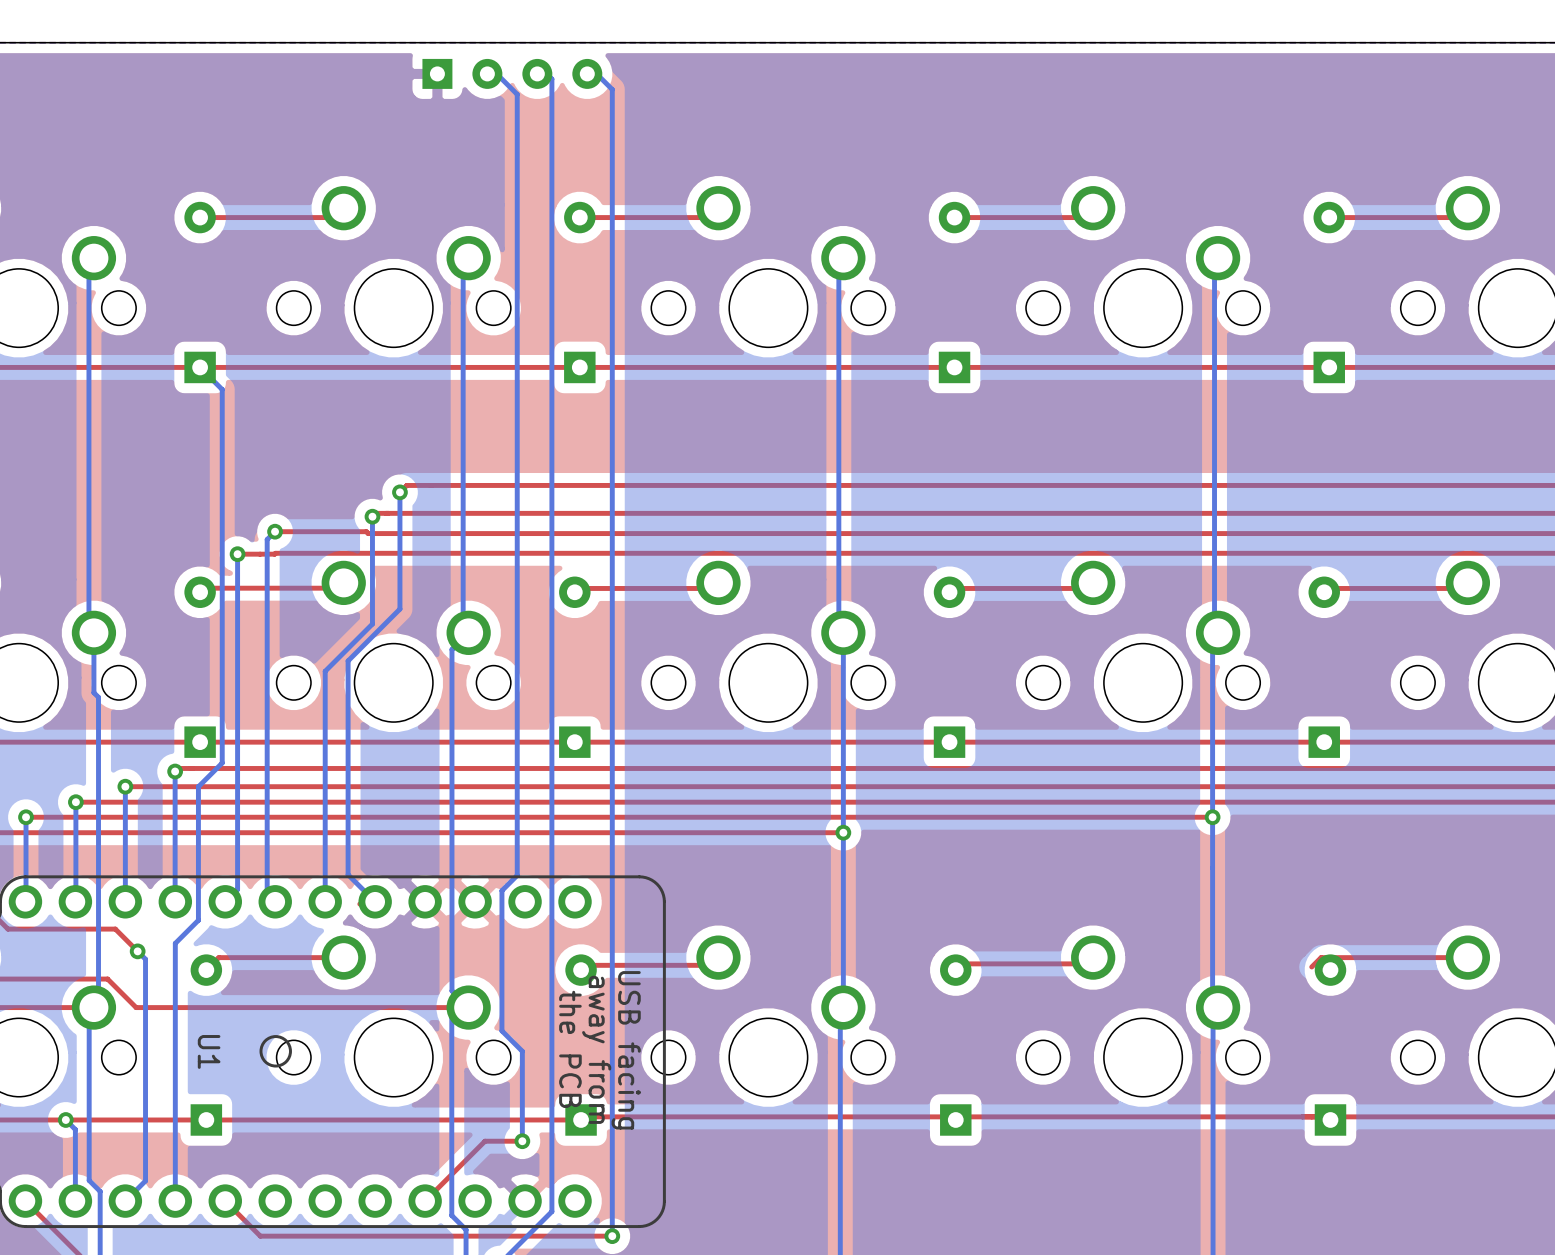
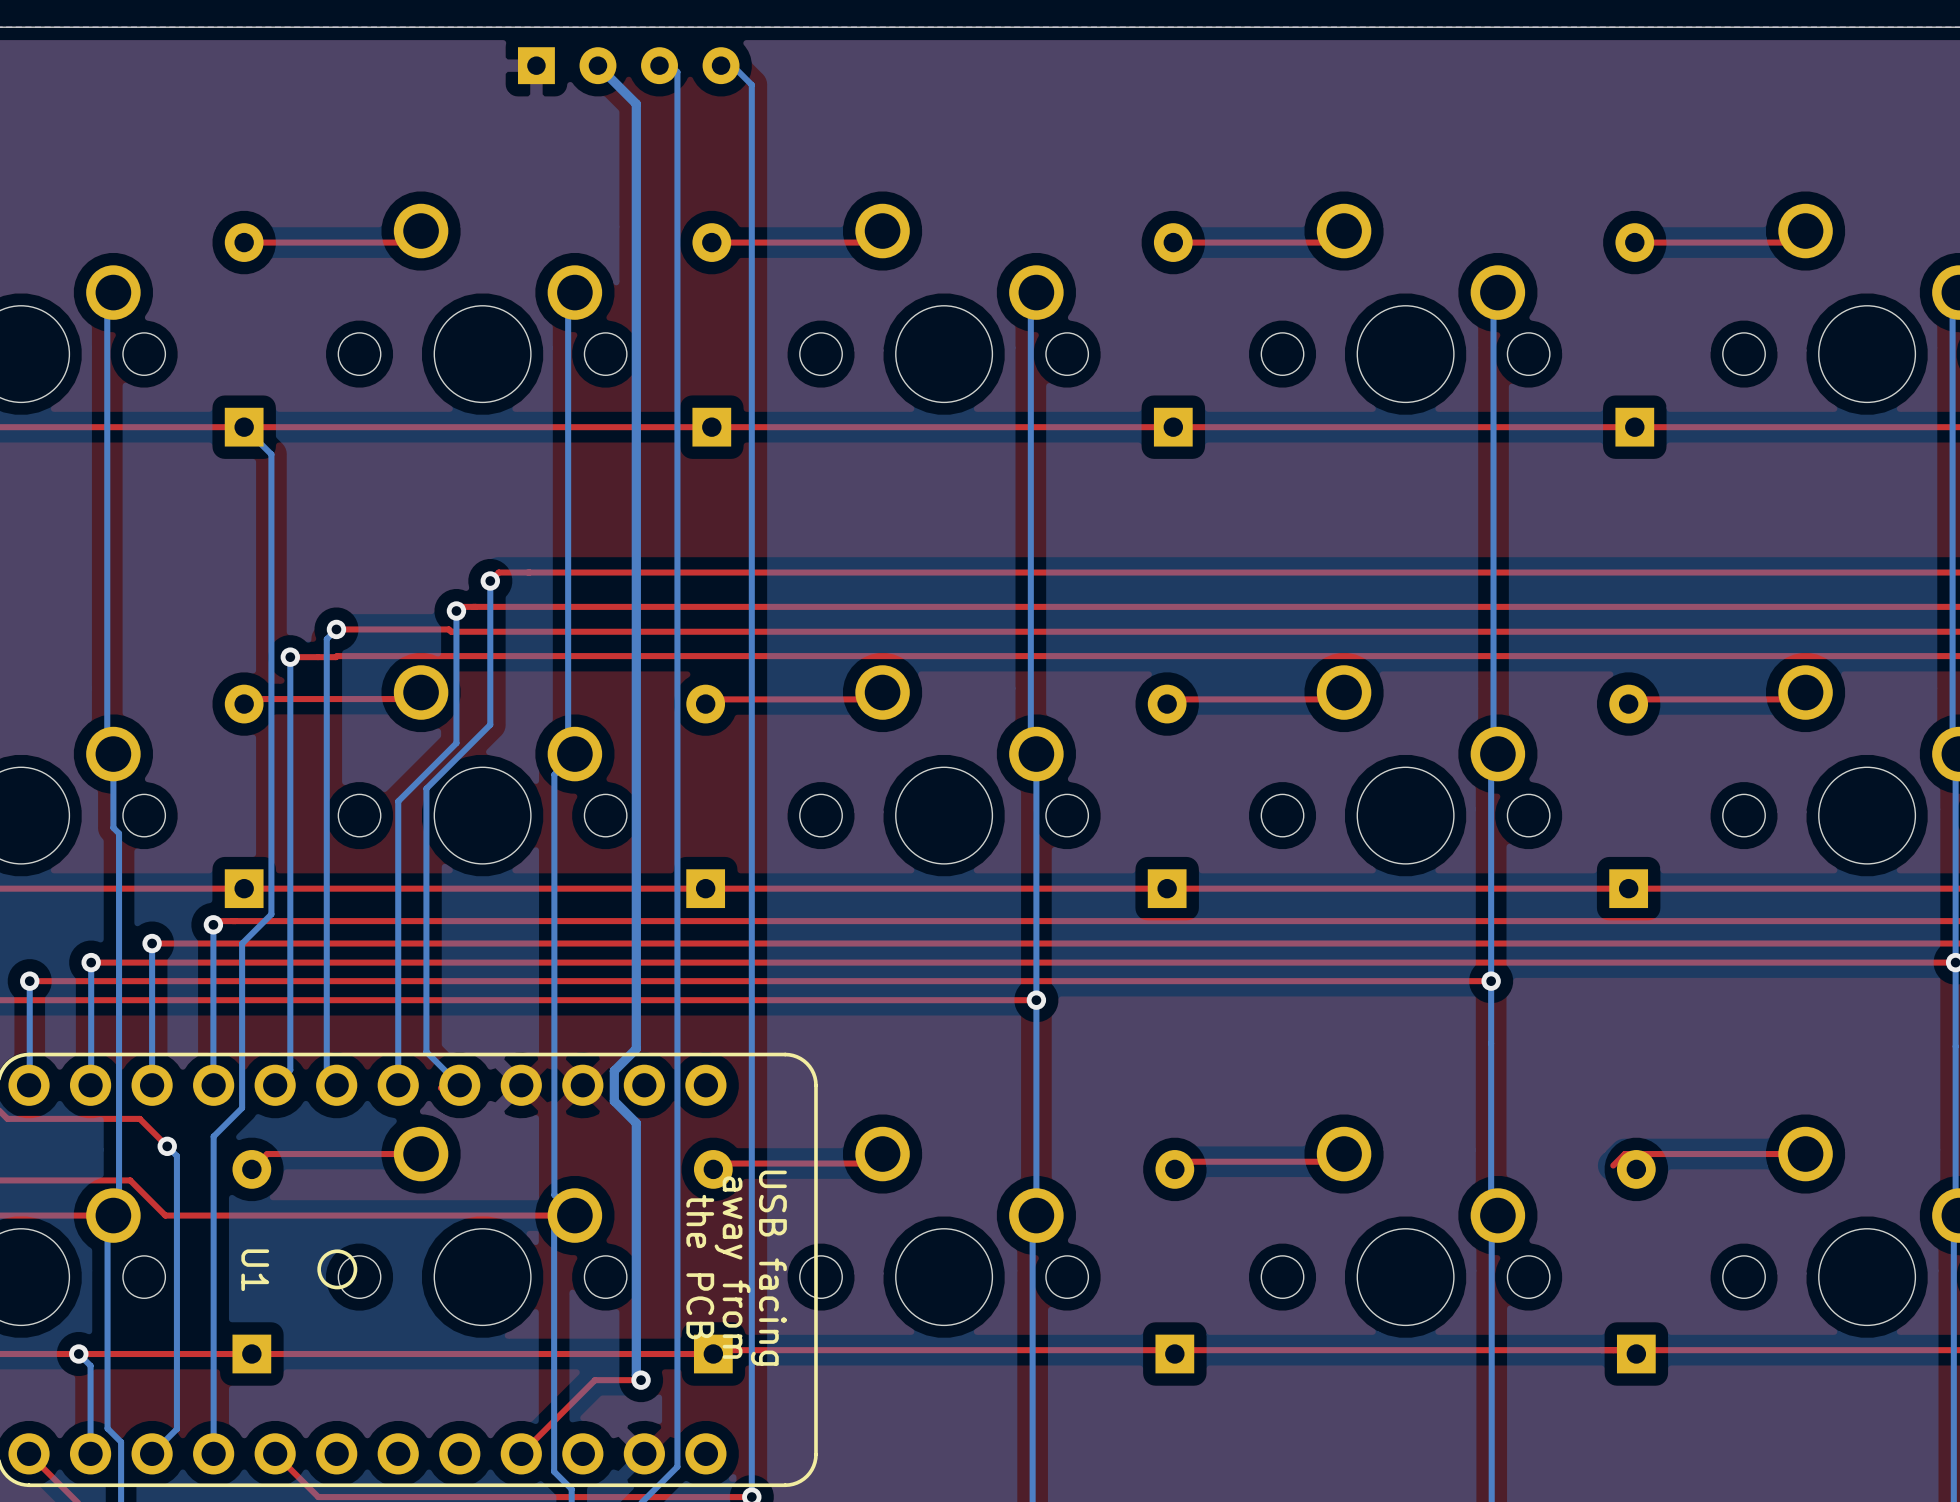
bottom track: (487, 64) (517, 94) (517, 875) (501, 890) (501, 1030) (522, 1051) (522, 1141) -> (597, 65) (636, 104) (636, 1048) (614, 1070) (614, 1101) (636, 1123) (636, 1375) (641, 1380)

